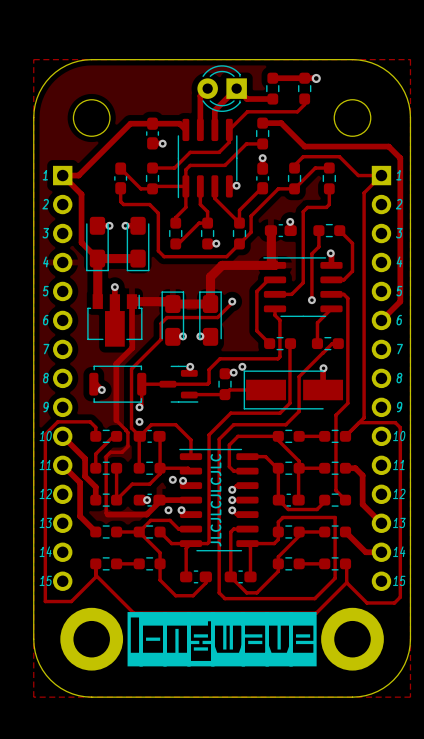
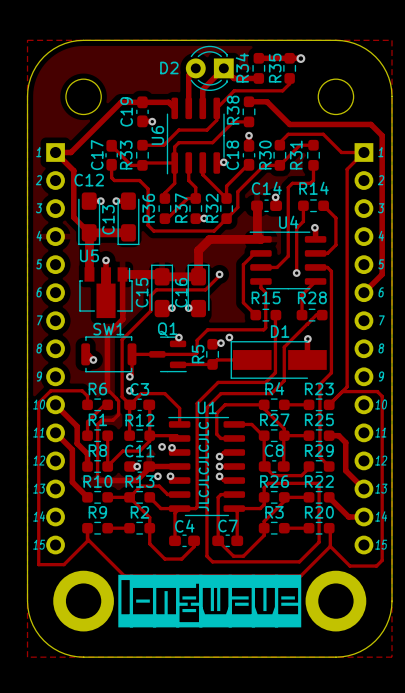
D2 name: none -> D2 (169, 67)
R34 name: none -> R34 (242, 67)
R35 name: none -> R35 (275, 68)
R38 name: none -> R38 (233, 110)
C19 name: none -> C19 (126, 111)
U6 name: none -> U6 (157, 135)
C17 name: none -> C17 (97, 155)
R33 name: none -> R33 (126, 155)
C18 name: none -> C18 (232, 155)
R30 name: none -> R30 (265, 155)
R31 name: none -> R31 (296, 155)
C12 name: none -> C12 (89, 180)
C14 name: none -> C14 (266, 188)
R14 name: none -> R14 (314, 188)
R37 name: none -> R37 (181, 208)
R36 name: none -> R36 (148, 208)
R32 name: none -> R32 (212, 208)
C13 name: none -> C13 (108, 219)
U4 name: none -> U4 (288, 222)
U5 name: none -> U5 (89, 255)
C15 name: none -> C15 (142, 292)
C16 name: none -> C16 (181, 292)
R15 name: none -> R15 (266, 297)
R28 name: none -> R28 (312, 297)
SW1 name: none -> SW1 (108, 329)
Q1 name: none -> Q1 (167, 329)
D1 name: none -> D1 (280, 331)
R5 name: none -> R5 (198, 354)
R6 name: none -> R6 (97, 389)
R4 name: none -> R4 (274, 388)
R23 name: none -> R23 (319, 389)
C3 name: none -> C3 (139, 389)
U1 name: none -> U1 (207, 407)
R1 name: none -> R1 (97, 419)
R27 name: none -> R27 (274, 419)
R25 name: none -> R25 (319, 419)
R12 name: none -> R12 (139, 420)
R8 name: none -> R8 (97, 450)
C8 name: none -> C8 (274, 450)
R29 name: none -> R29 (319, 450)
C11 name: none -> C11 (139, 451)
R10 name: none -> R10 (97, 481)
R13 name: none -> R13 (139, 481)
R26 name: none -> R26 (274, 481)
R22 name: none -> R22 (319, 481)
R9 name: none -> R9 (97, 512)
R2 name: none -> R2 (139, 512)
R3 name: none -> R3 (274, 512)
R20 name: none -> R20 (319, 512)
C4 name: none -> C4 (184, 526)
C7 name: none -> C7 (227, 526)

